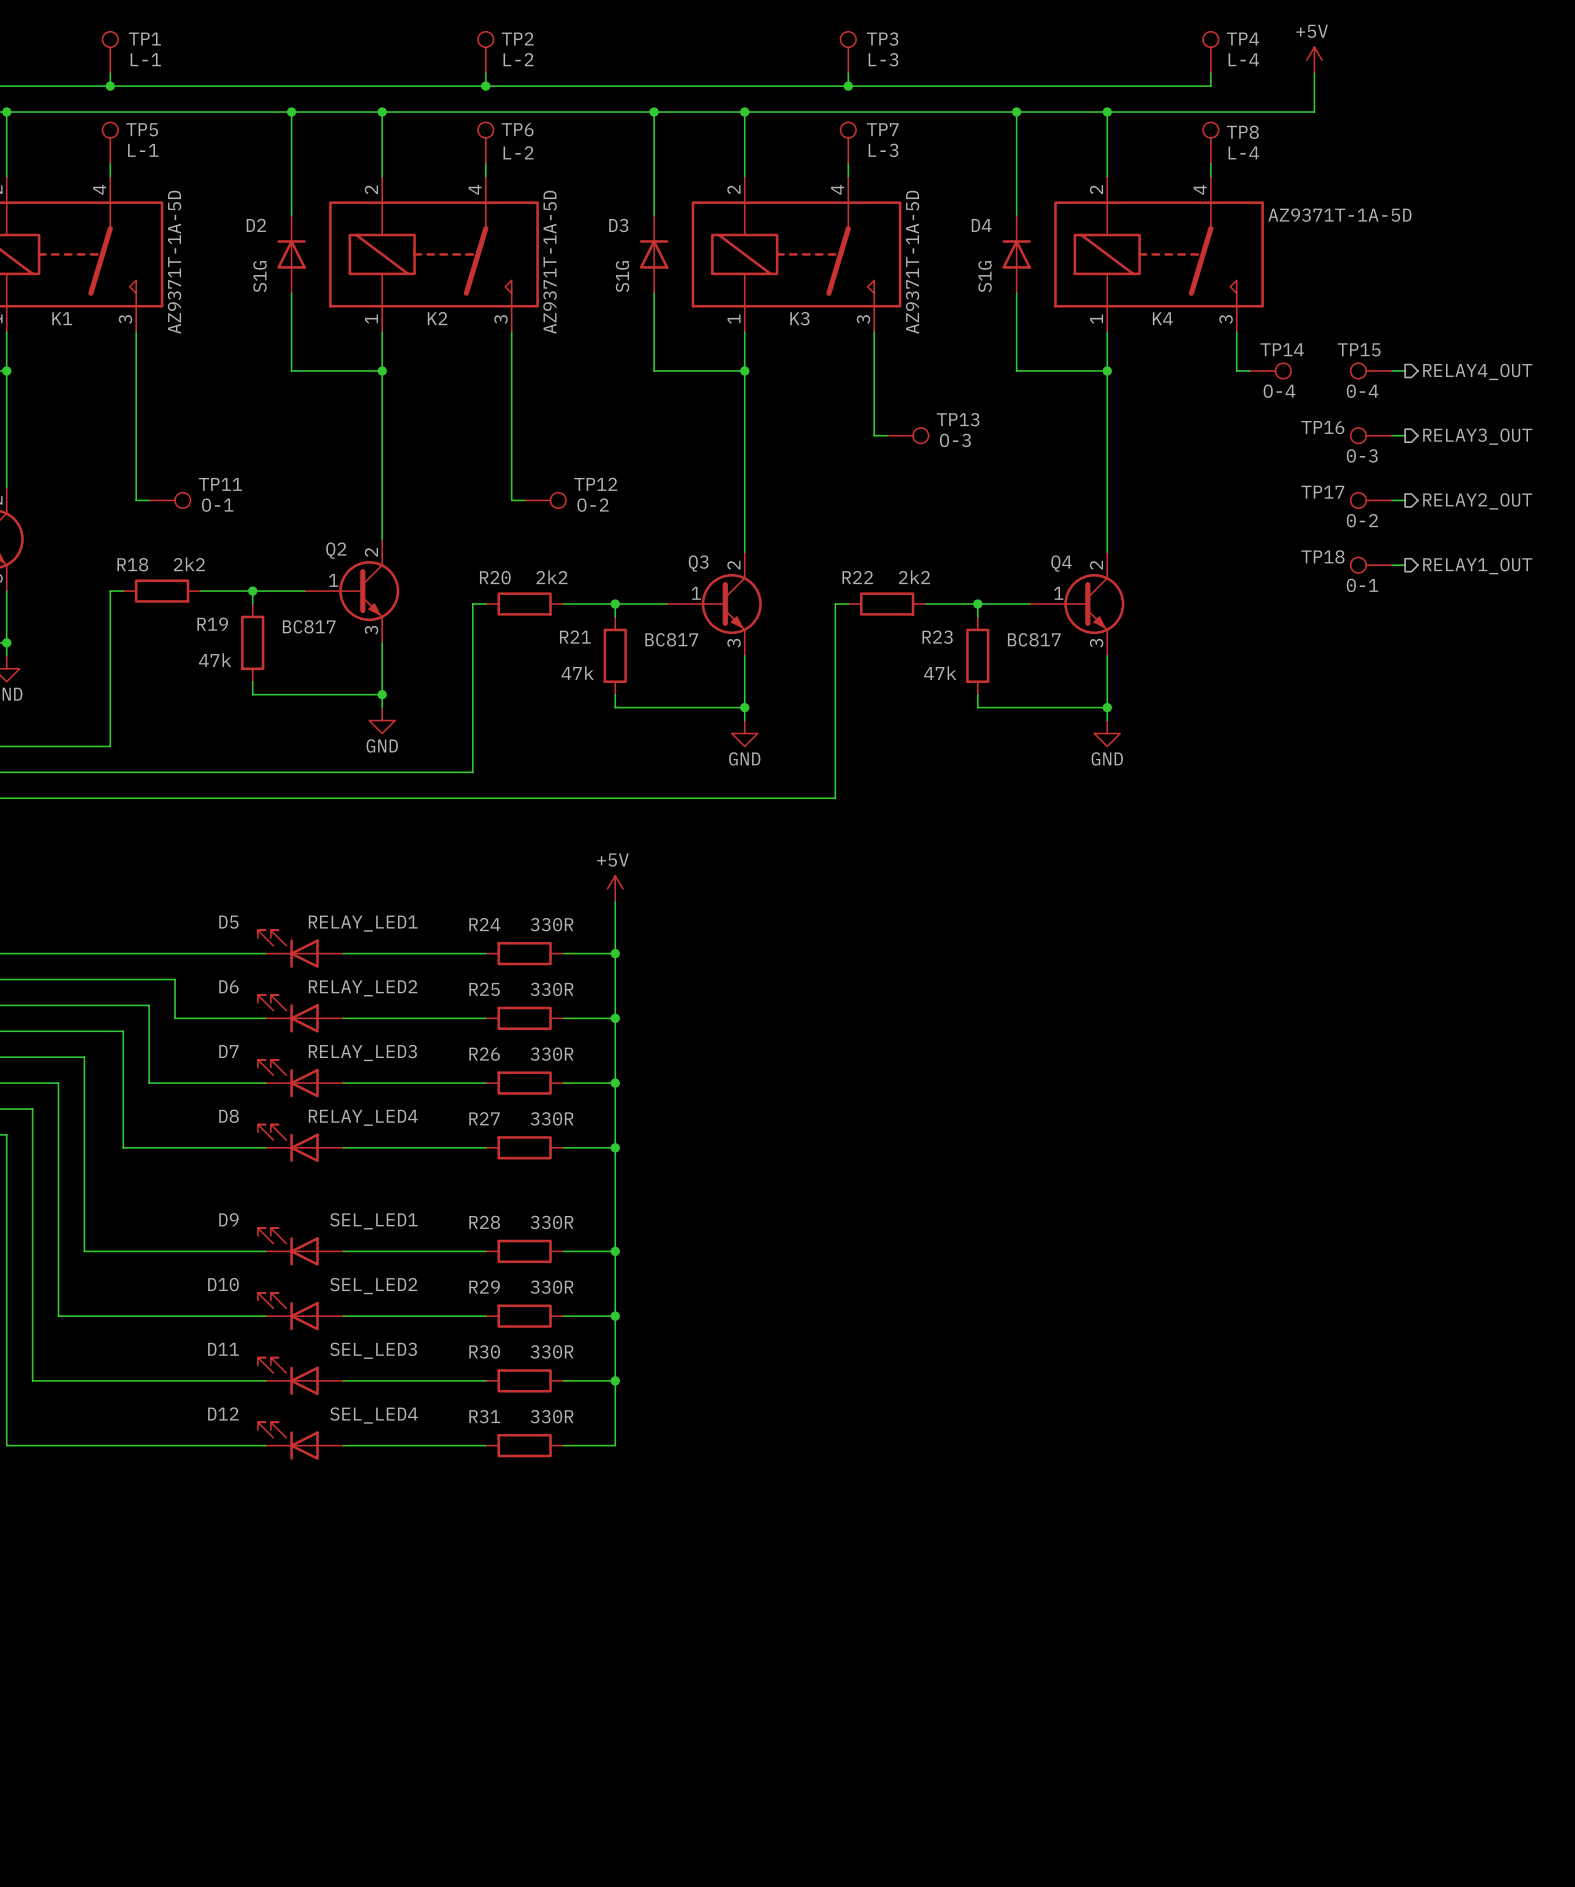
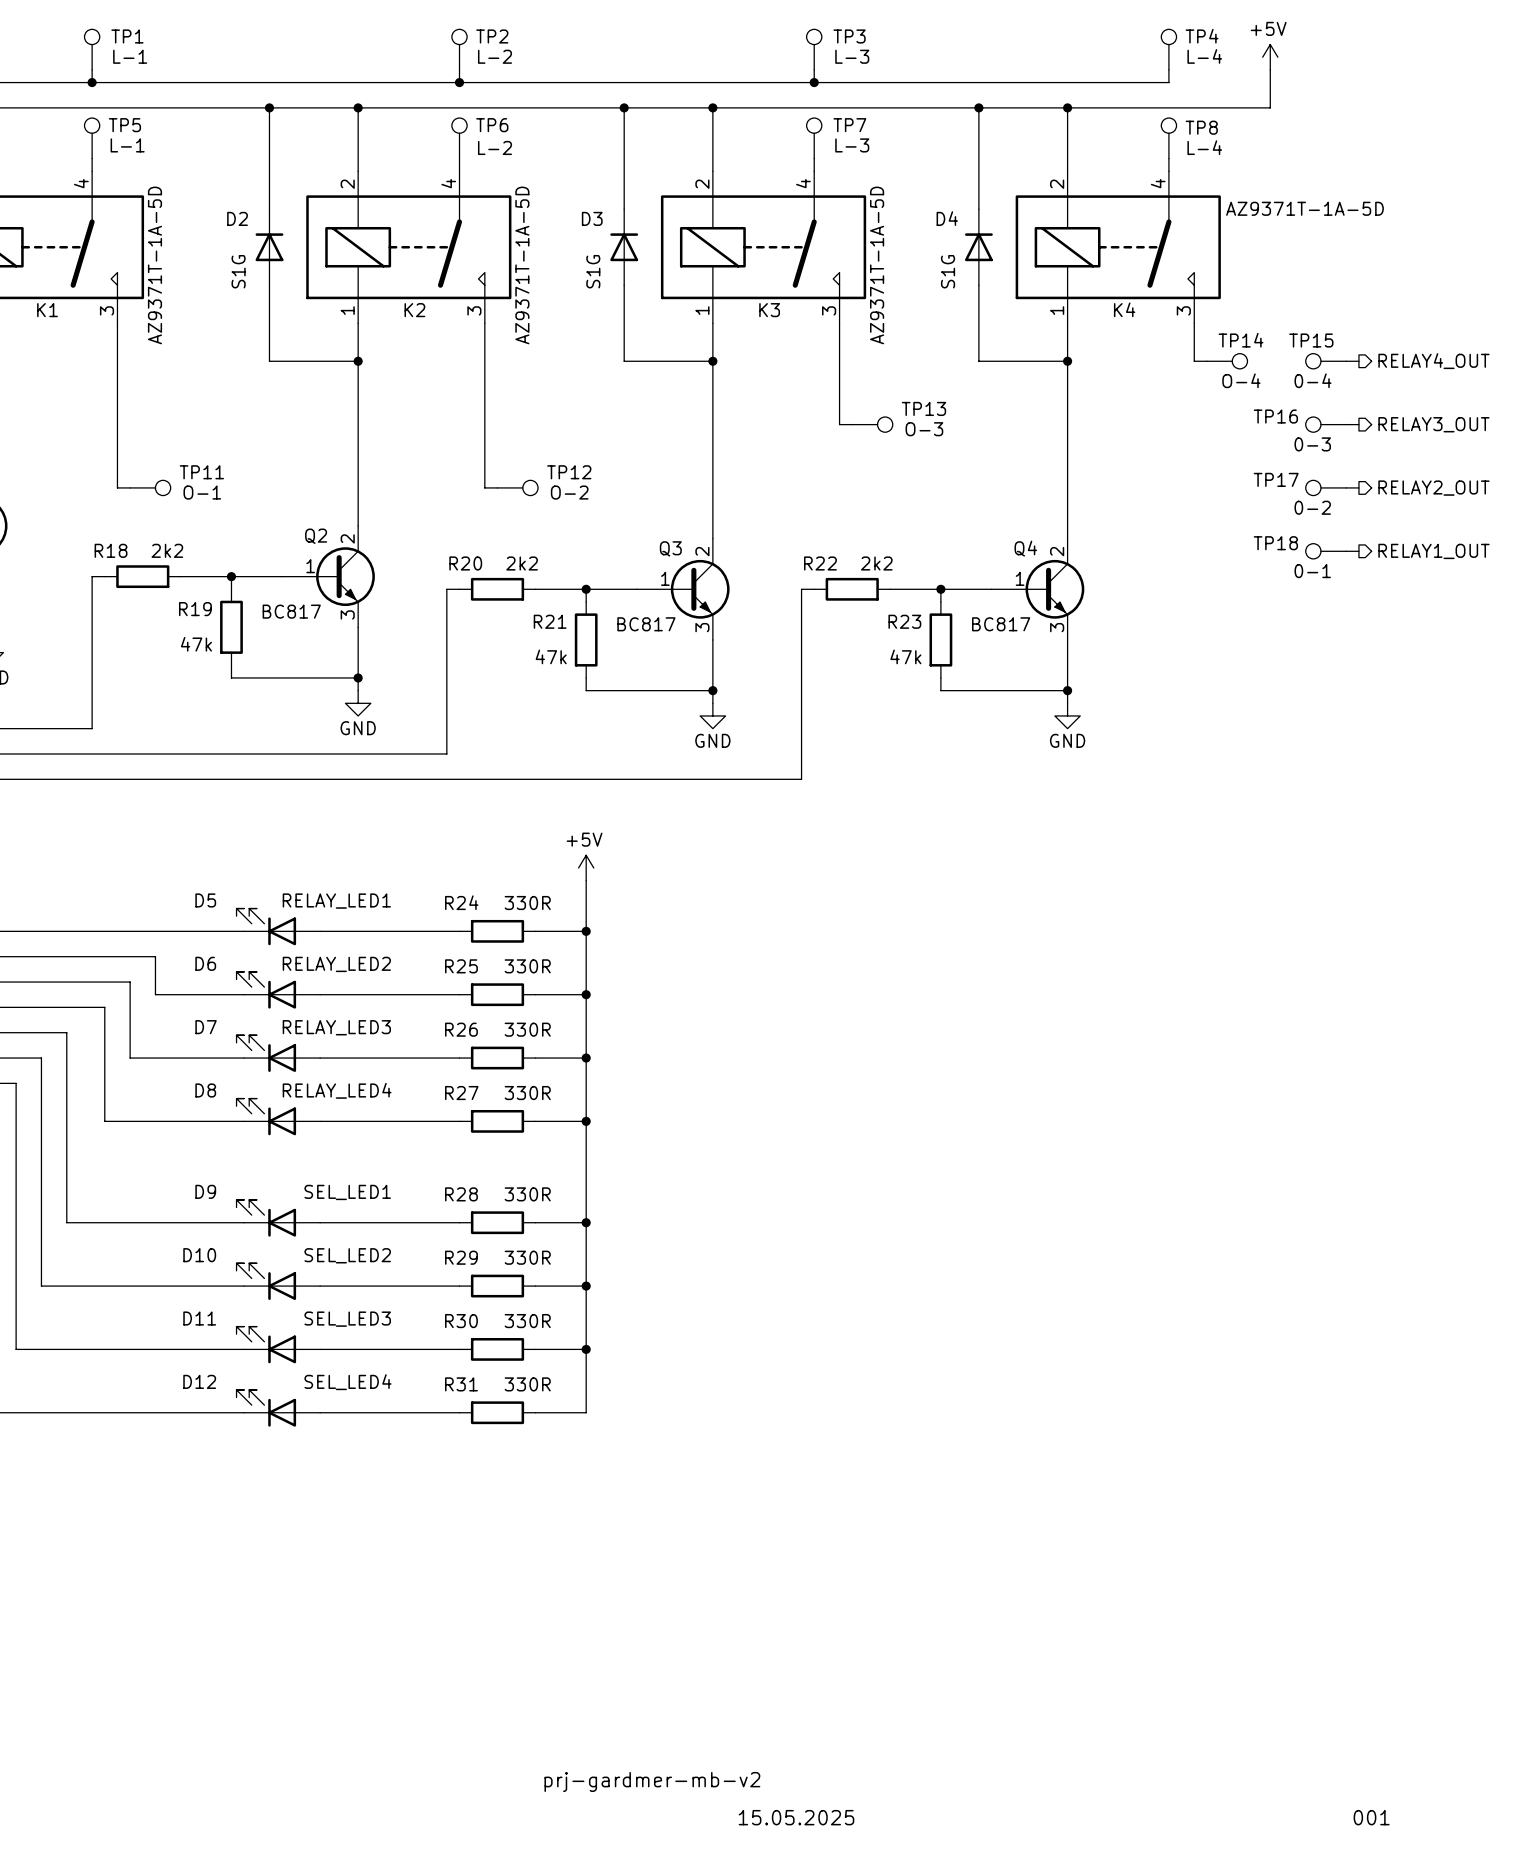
text: none -> prj-gardmer-mb-v2 (652, 1781)
text: none -> 15.05.2025 (796, 1817)
text: none -> 001 (1371, 1817)

